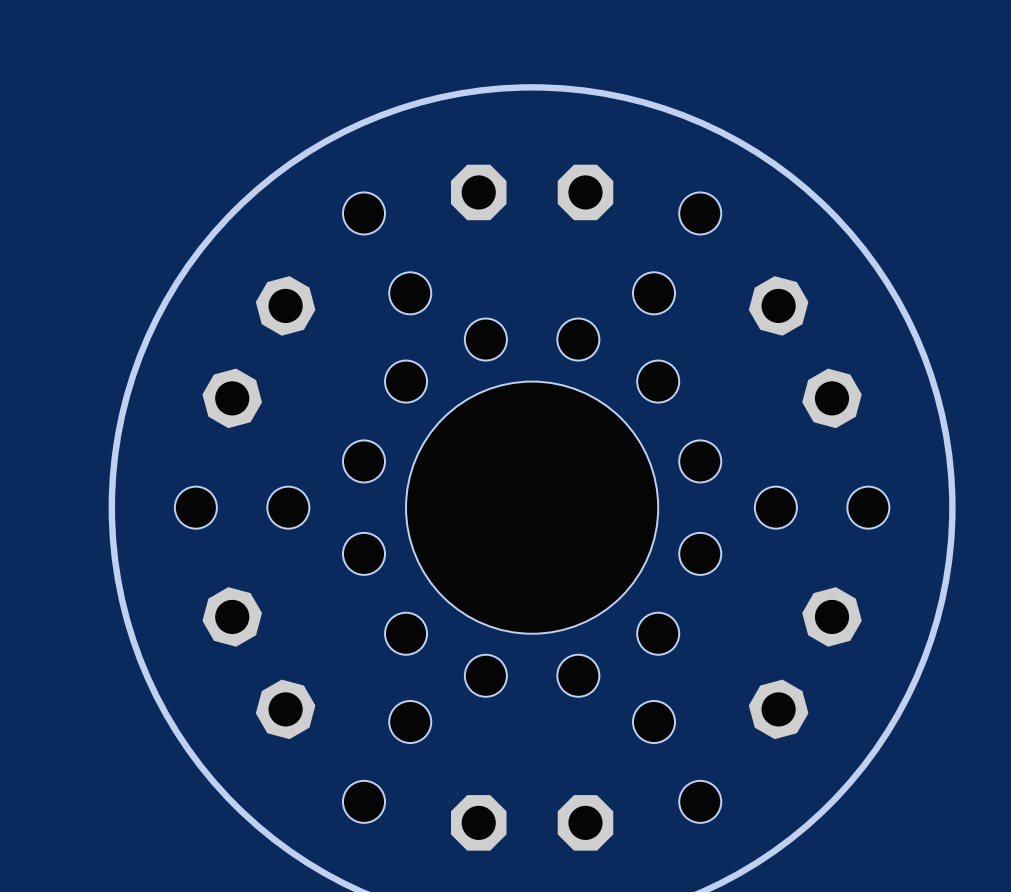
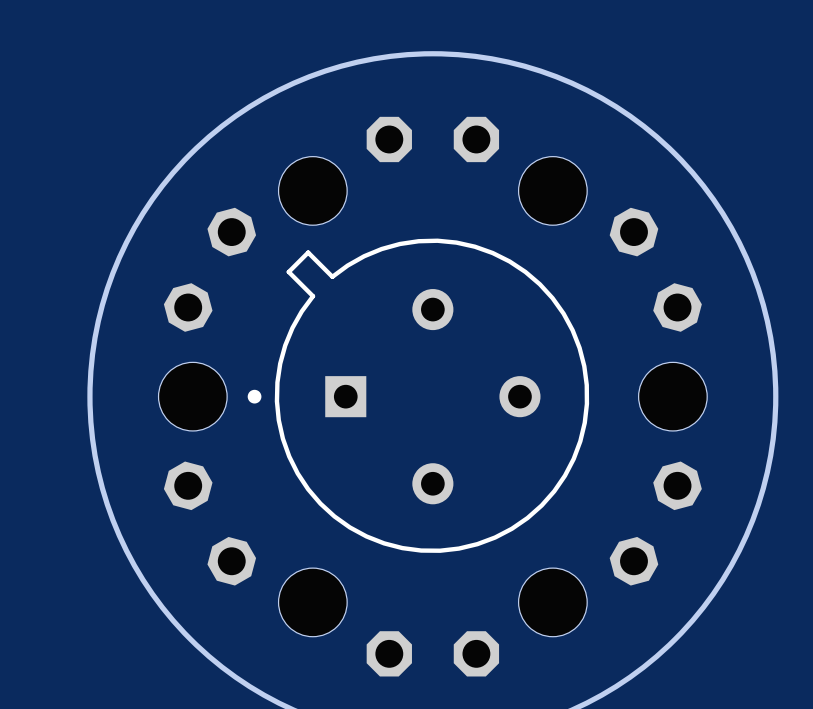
hole: (364, 213) -> none
hole: (700, 213) -> none
hole: none -> (312, 190)
hole: none -> (552, 190)
hole: (410, 293) -> none
hole: (653, 293) -> none
hole: (485, 339) -> none
hole: (578, 339) -> none
hole: (406, 381) -> none
hole: (658, 381) -> none
hole: (364, 461) -> none
hole: (700, 461) -> none
part: none -> (418, 395)
hole: (195, 507) -> none
hole: none -> (192, 396)
hole: (288, 507) -> none
hole: (532, 507) -> none
hole: (775, 507) -> none
hole: none -> (672, 396)
hole: (868, 507) -> none
hole: (364, 553) -> none
hole: (700, 553) -> none
hole: (406, 633) -> none
hole: (658, 633) -> none
hole: (485, 675) -> none
hole: (578, 675) -> none
hole: (410, 722) -> none
hole: (653, 722) -> none
hole: none -> (312, 602)
hole: none -> (552, 602)
hole: (364, 801) -> none
hole: (700, 801) -> none

